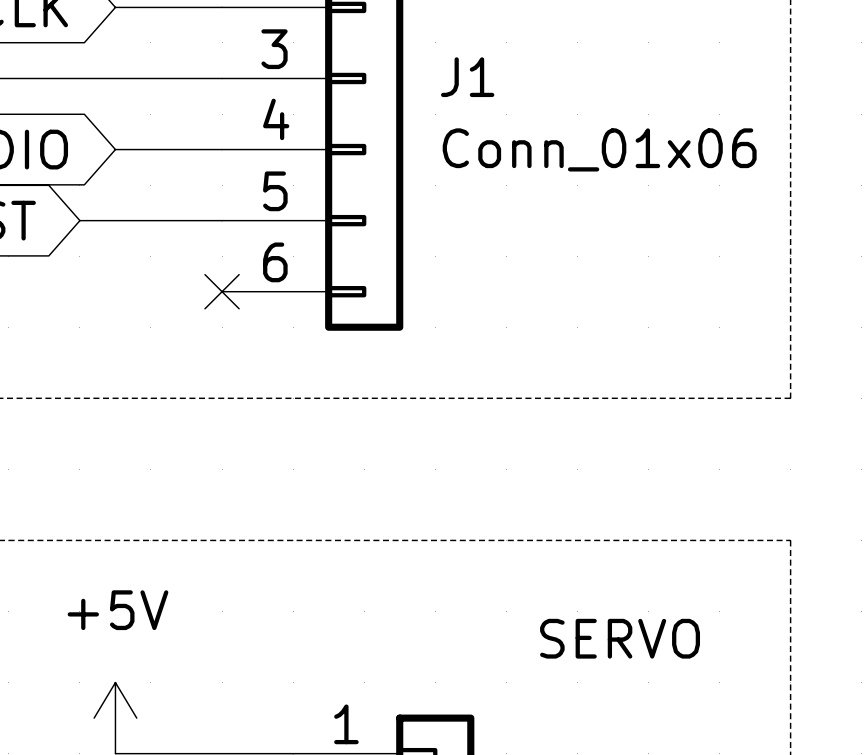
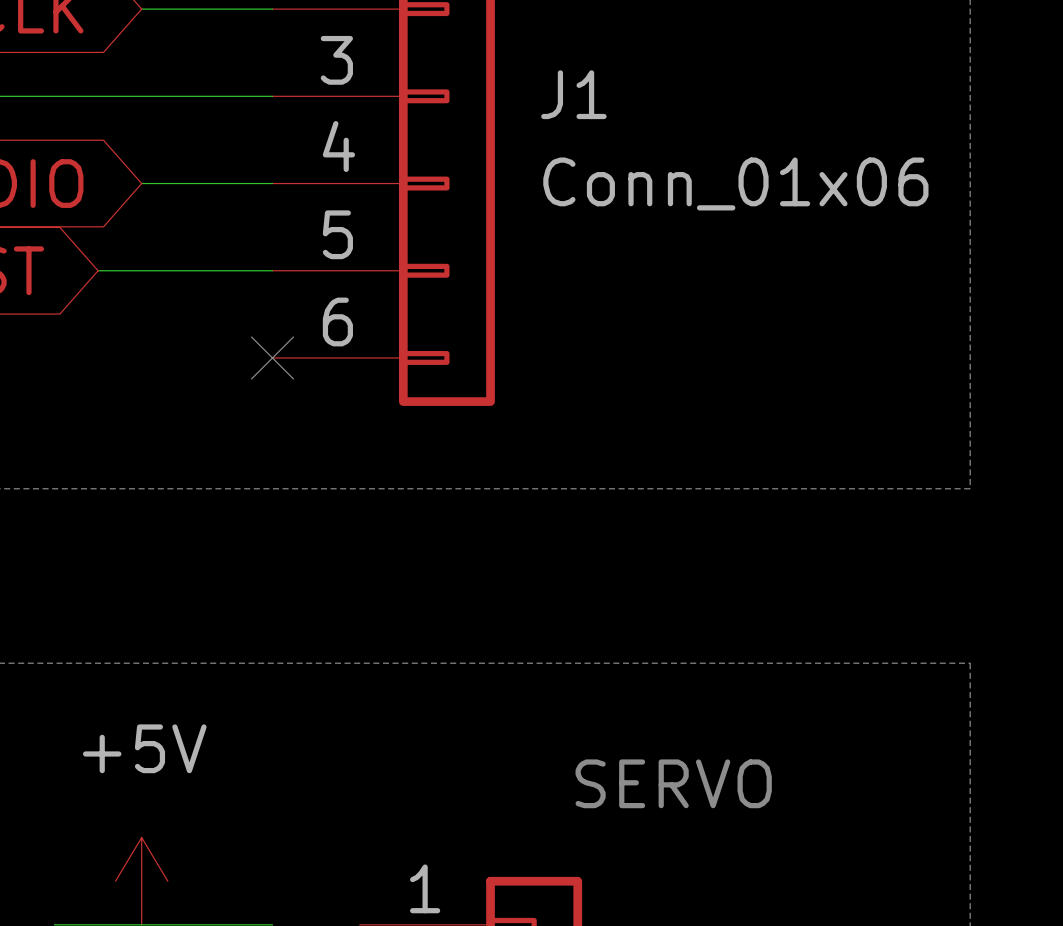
text position: SERVO (620, 638) -> SERVO (673, 783)
wire: (222, 753) (293, 753) -> (54, 924) (141, 924)

